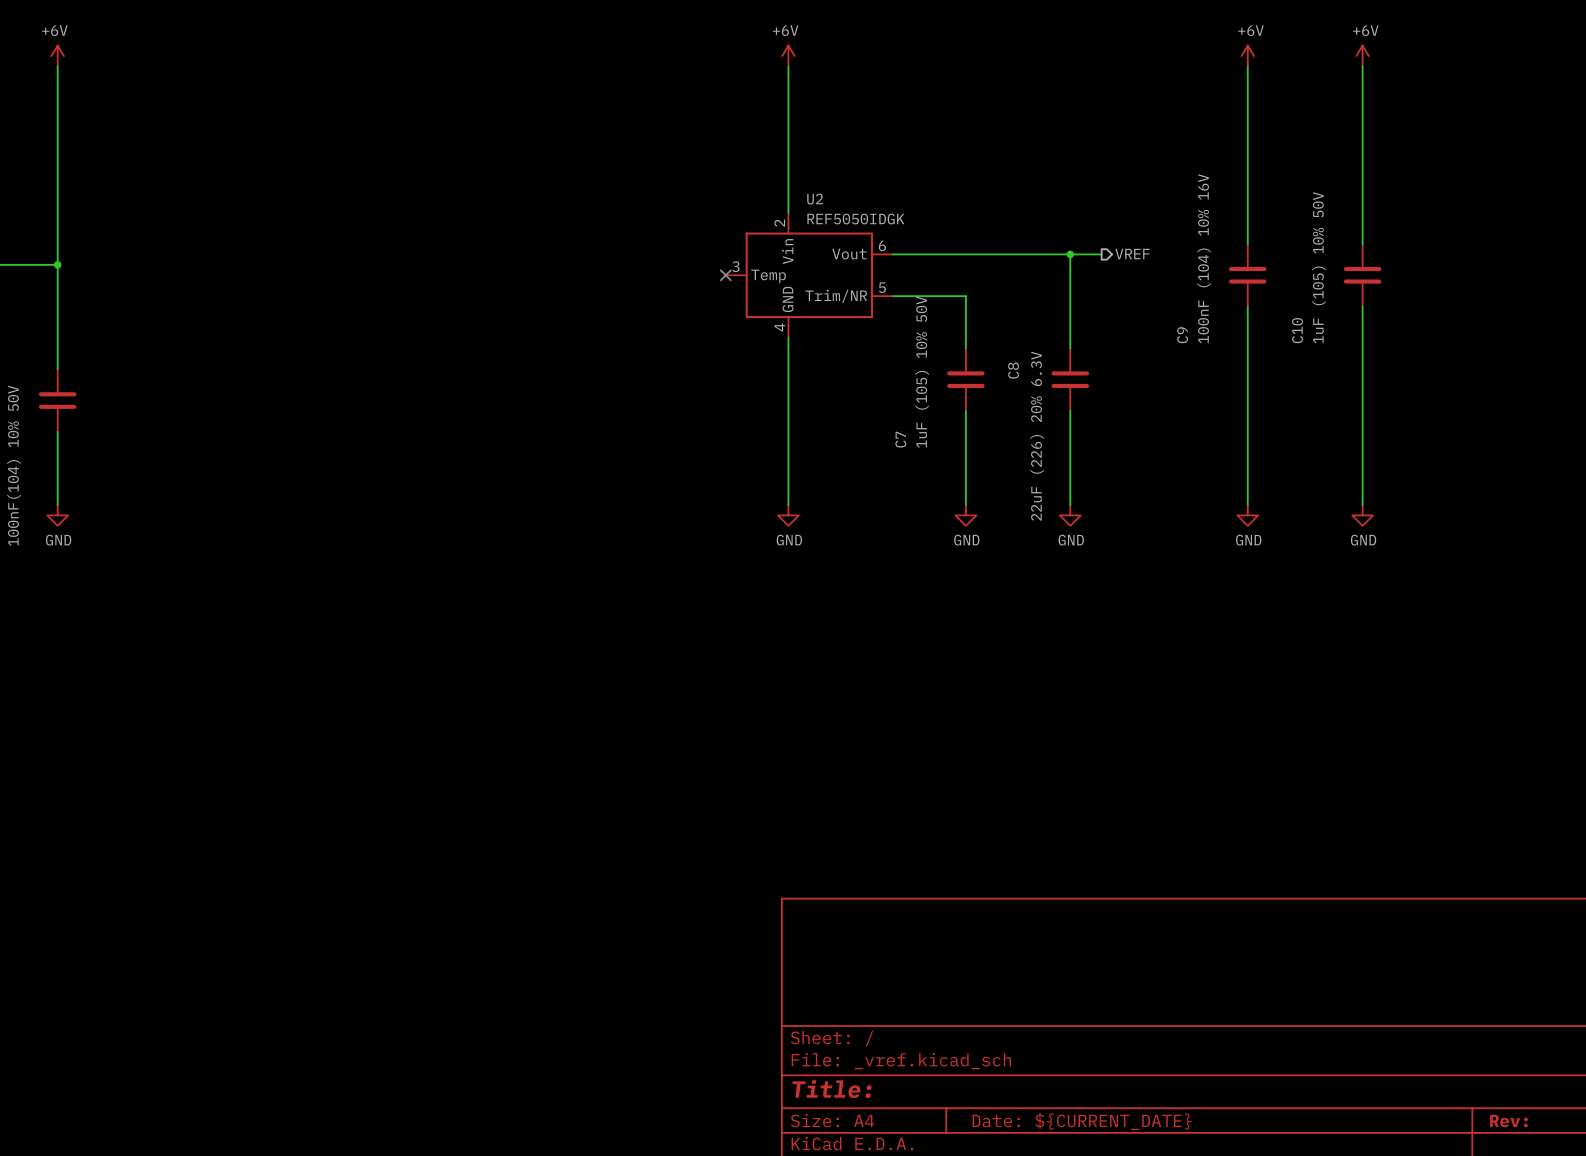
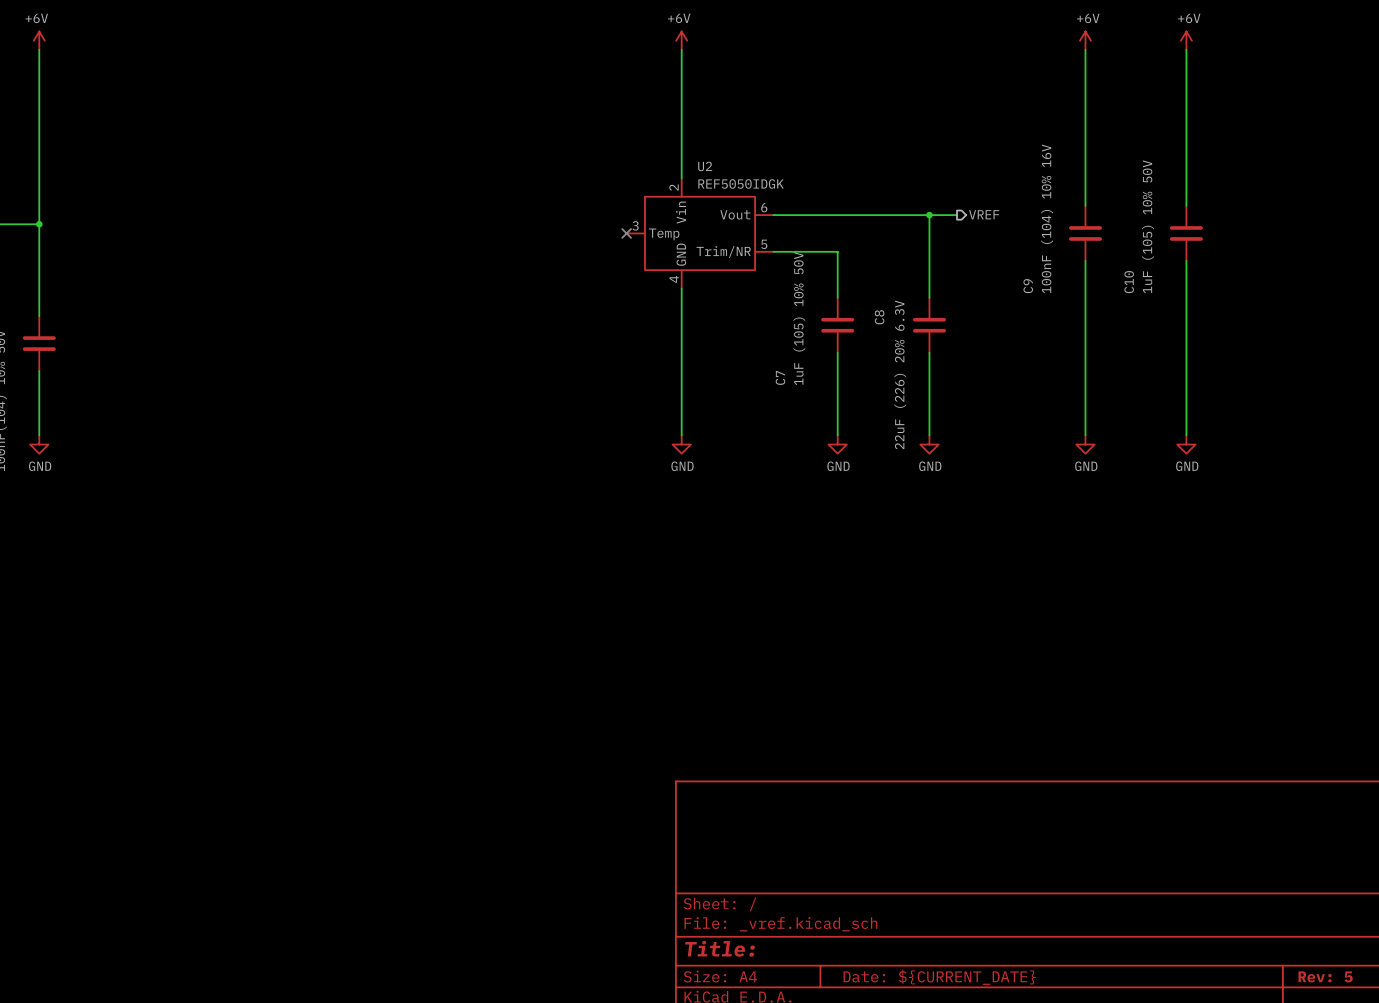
title block: Rev: (1508, 1121) -> Rev: 5 (1325, 976)

